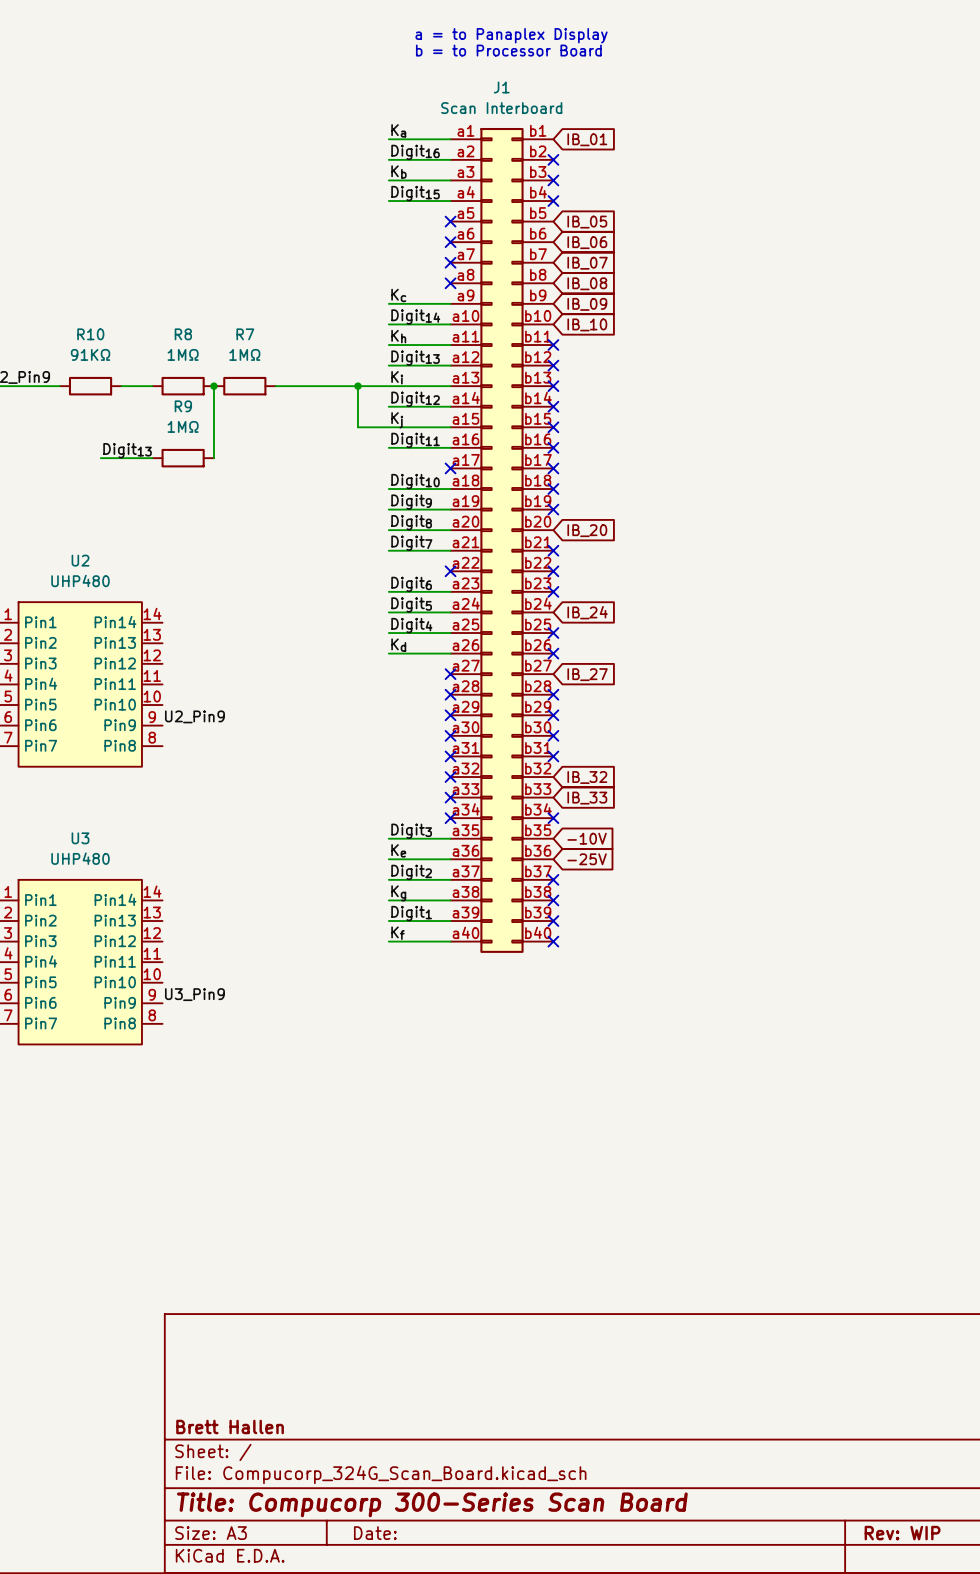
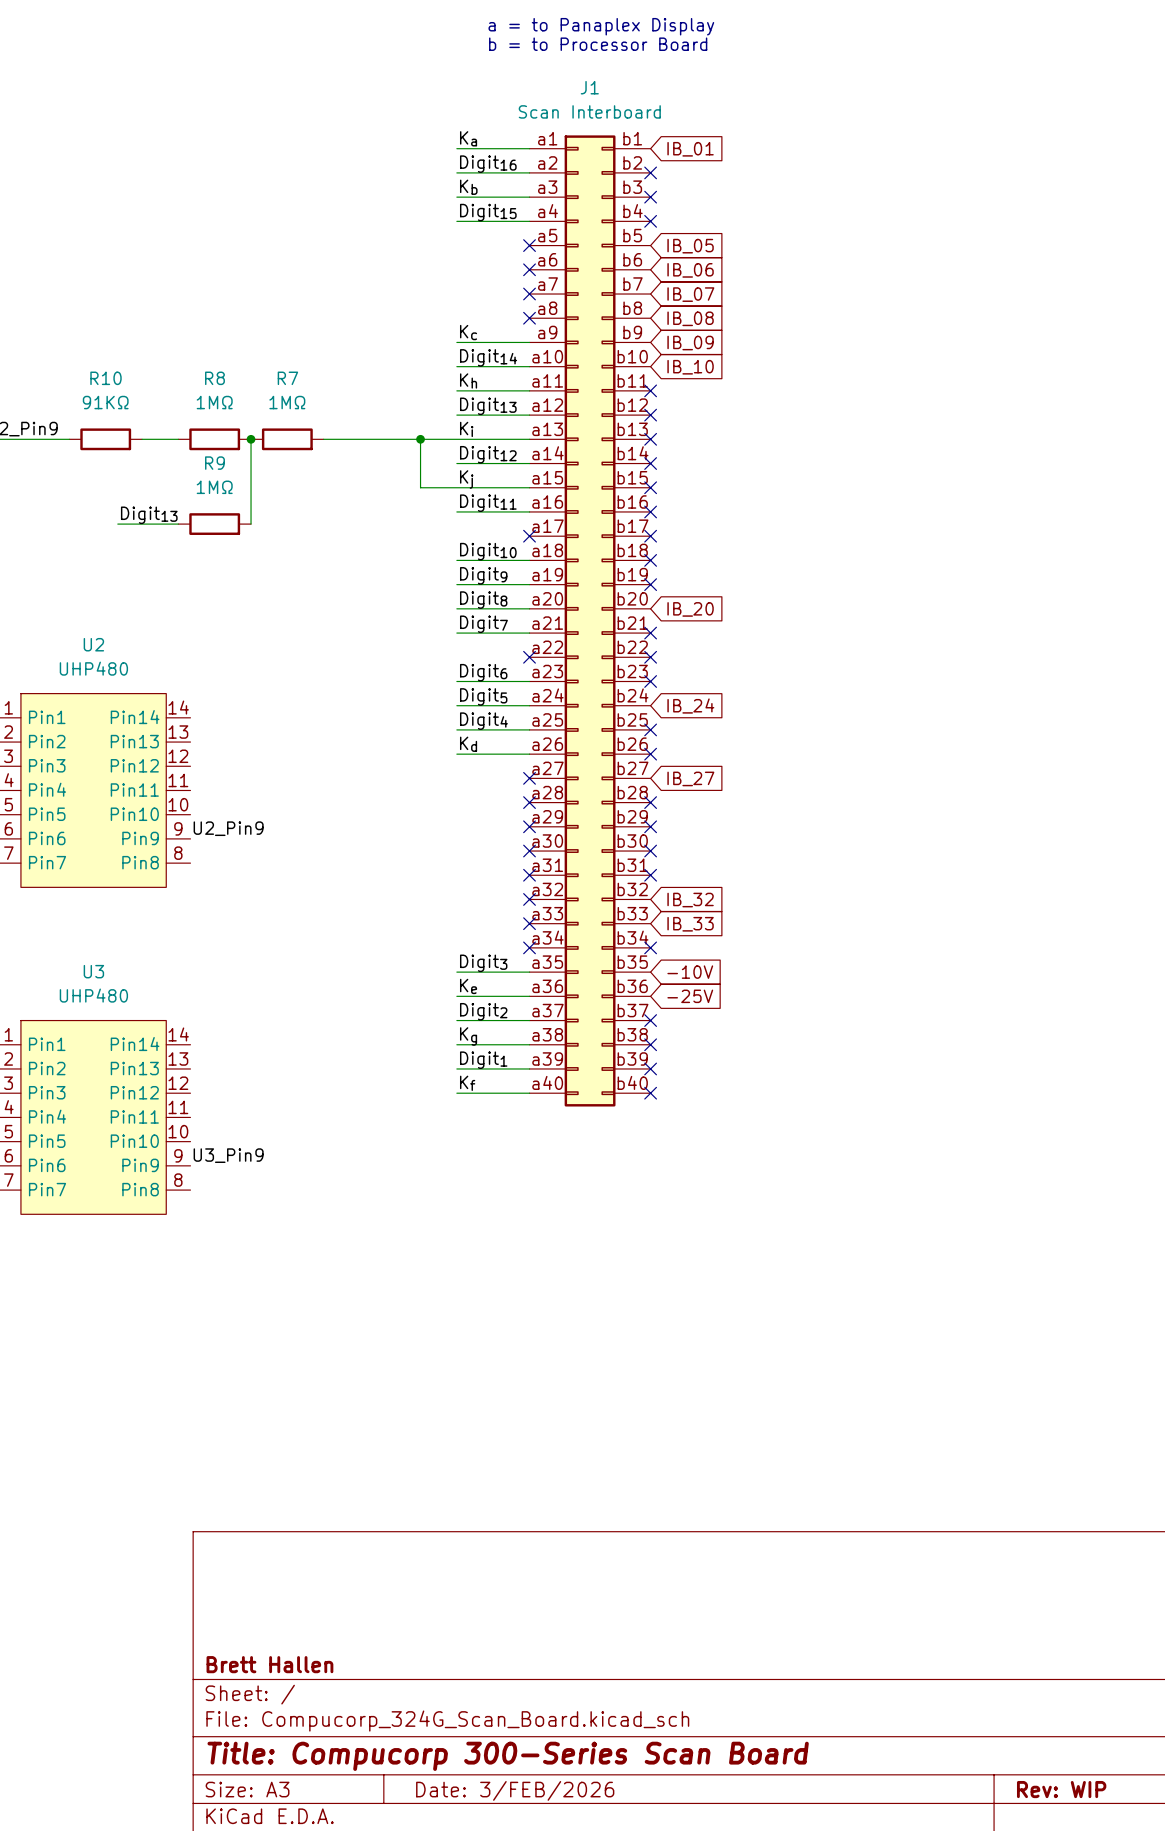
title block: Date: (375, 1533) -> Date: 3/FEB/2026 (515, 1790)

